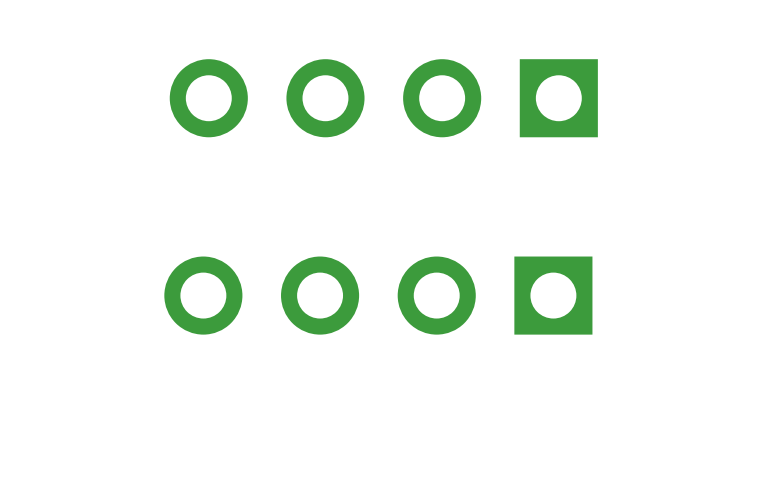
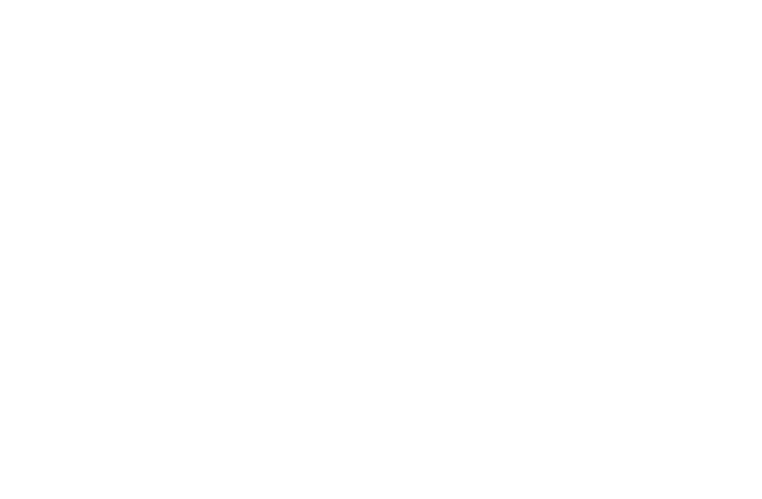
part: (383, 98) -> none
part: (378, 295) -> none

